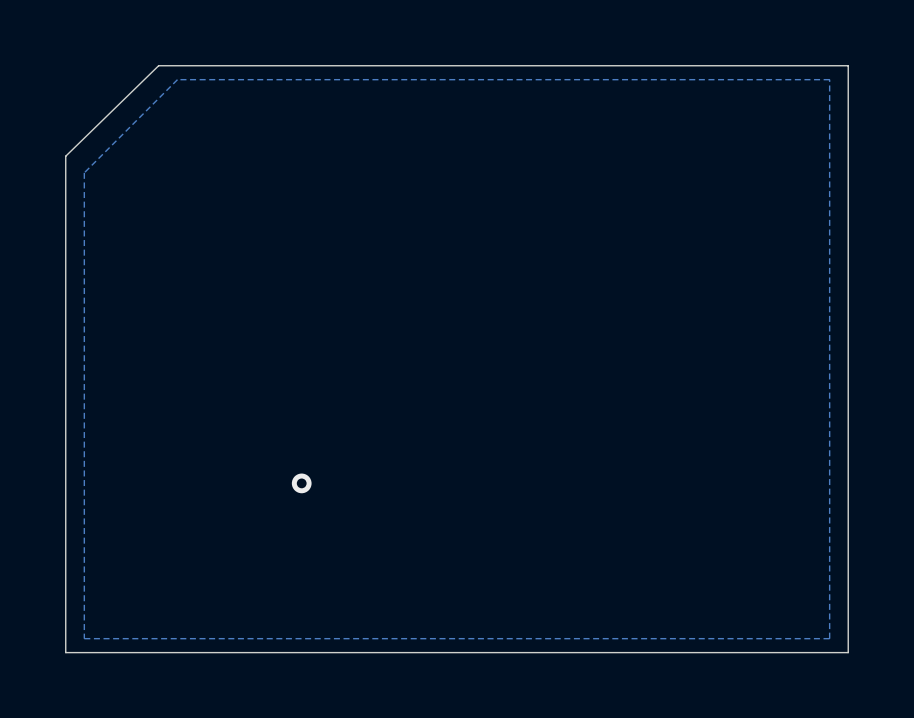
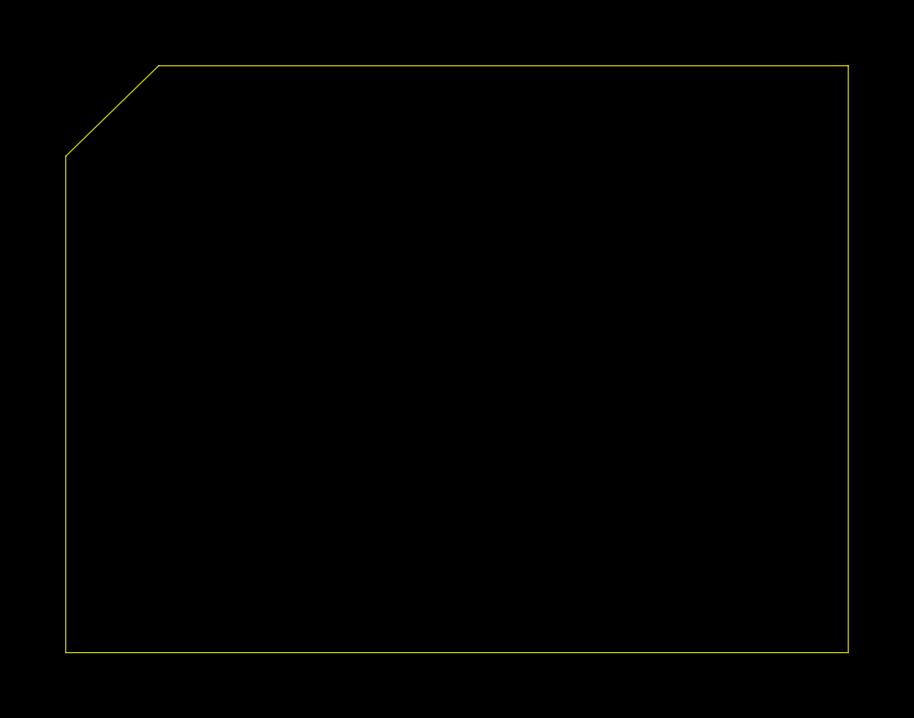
zone outline: (829, 79) (177, 79) (84, 172) (84, 638) (829, 638) (829, 79) -> none
via: (301, 483) -> none

